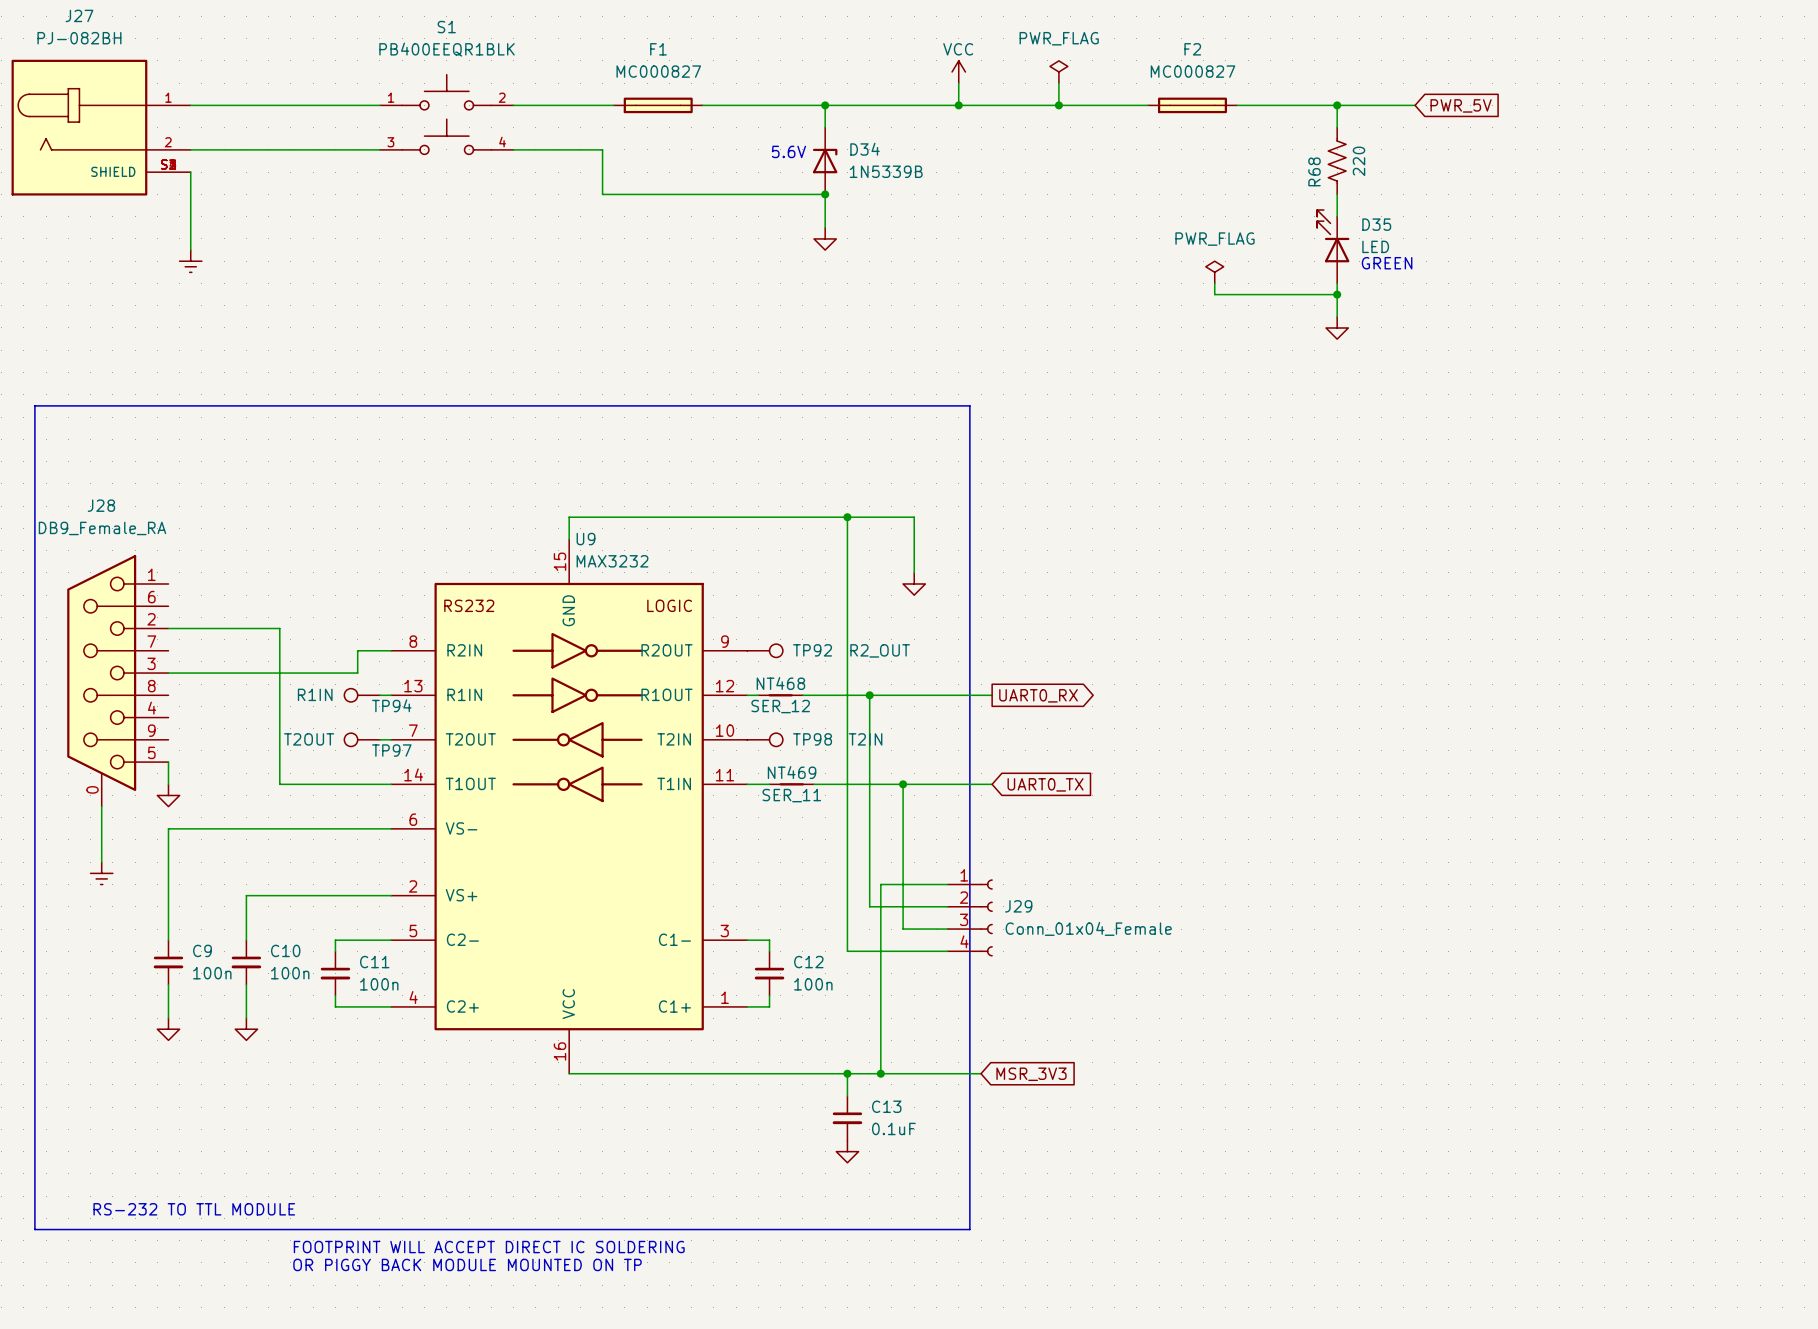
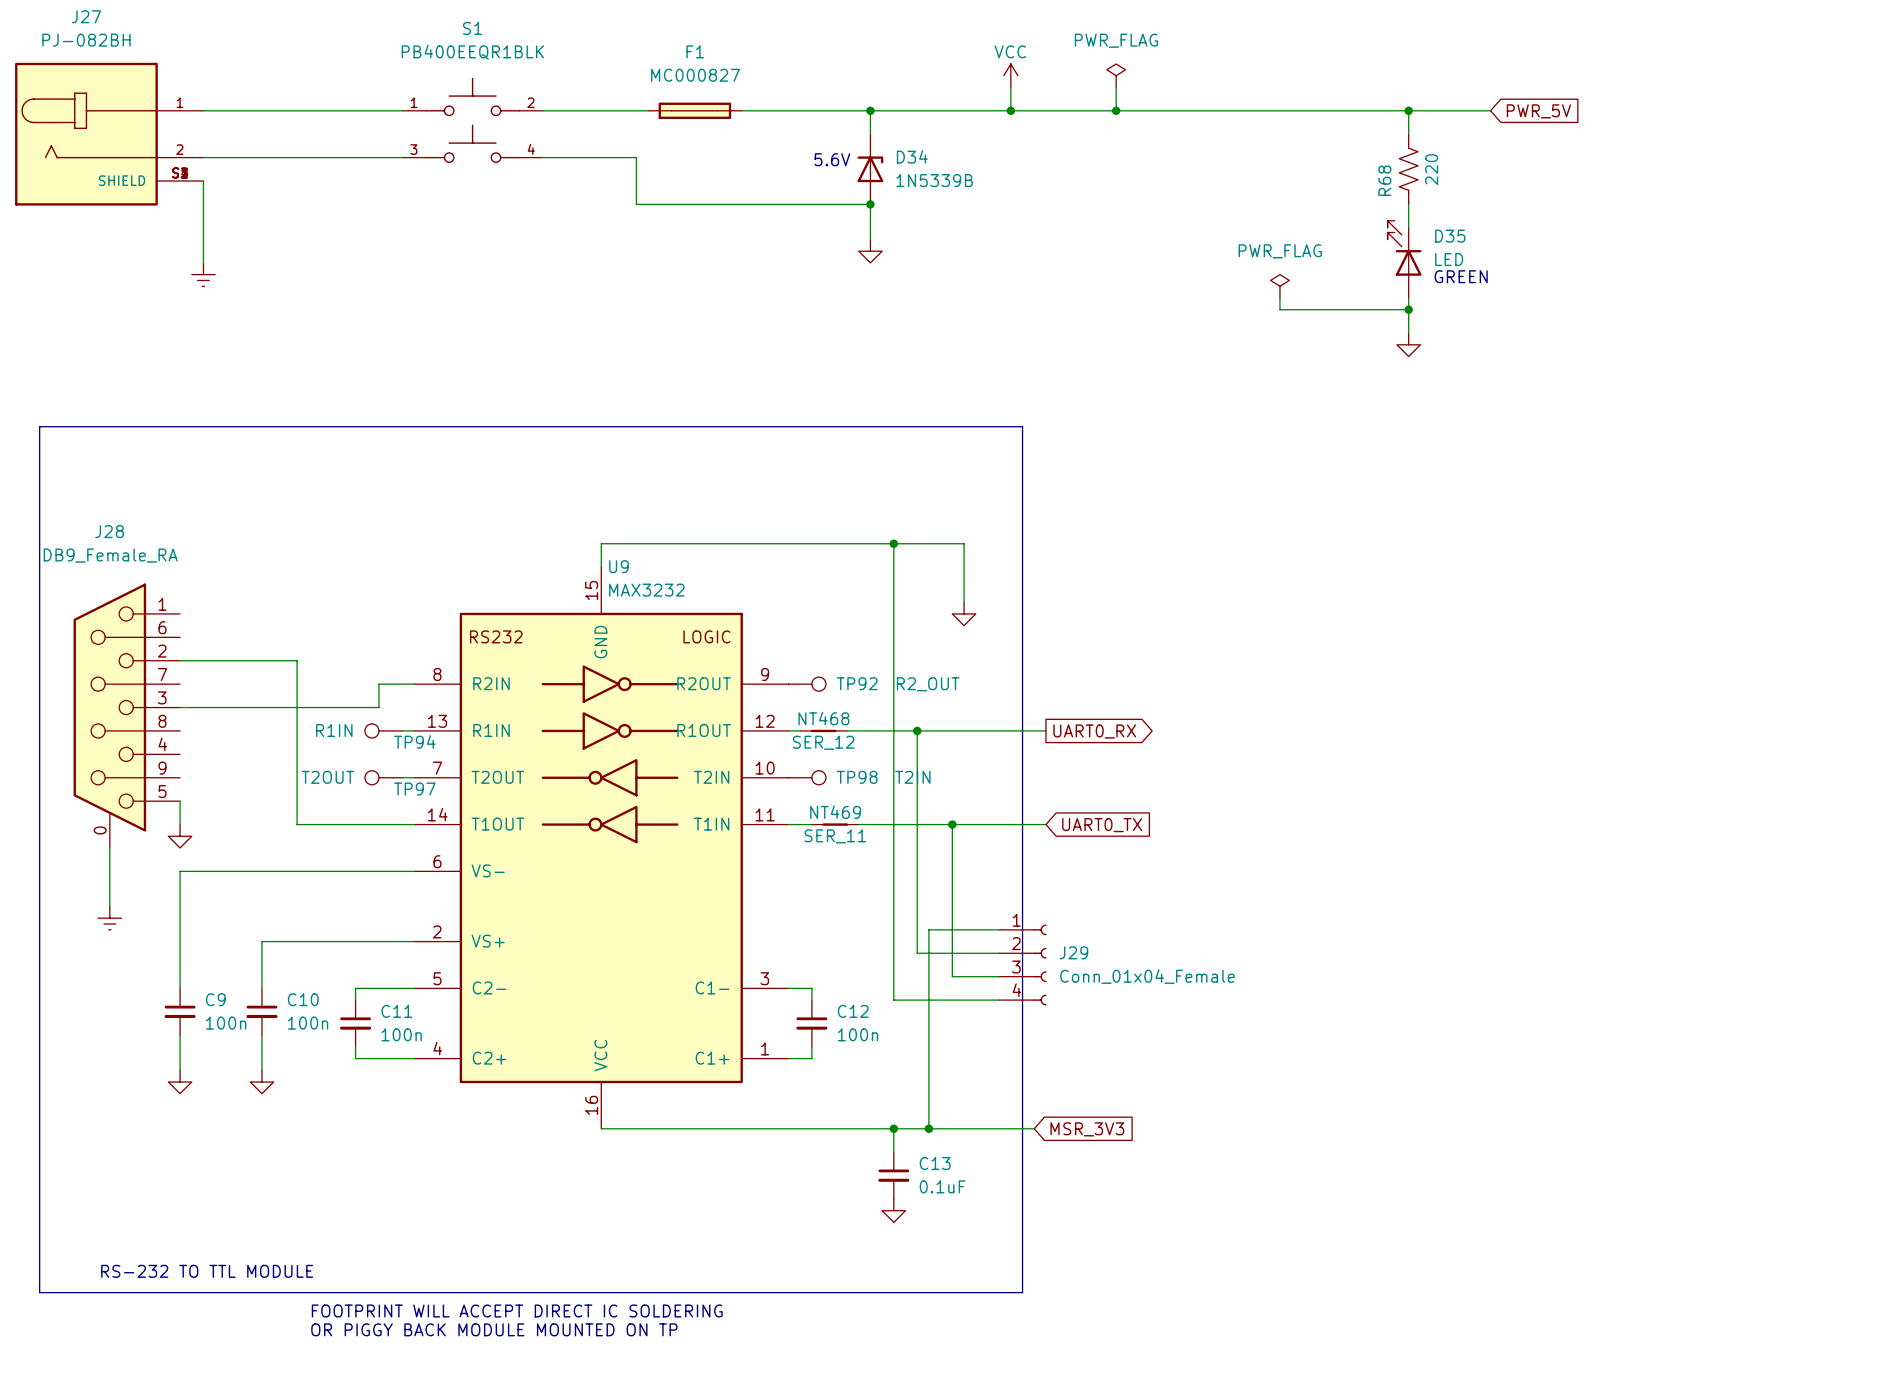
F2: MC000827 (1192, 105) -> none

